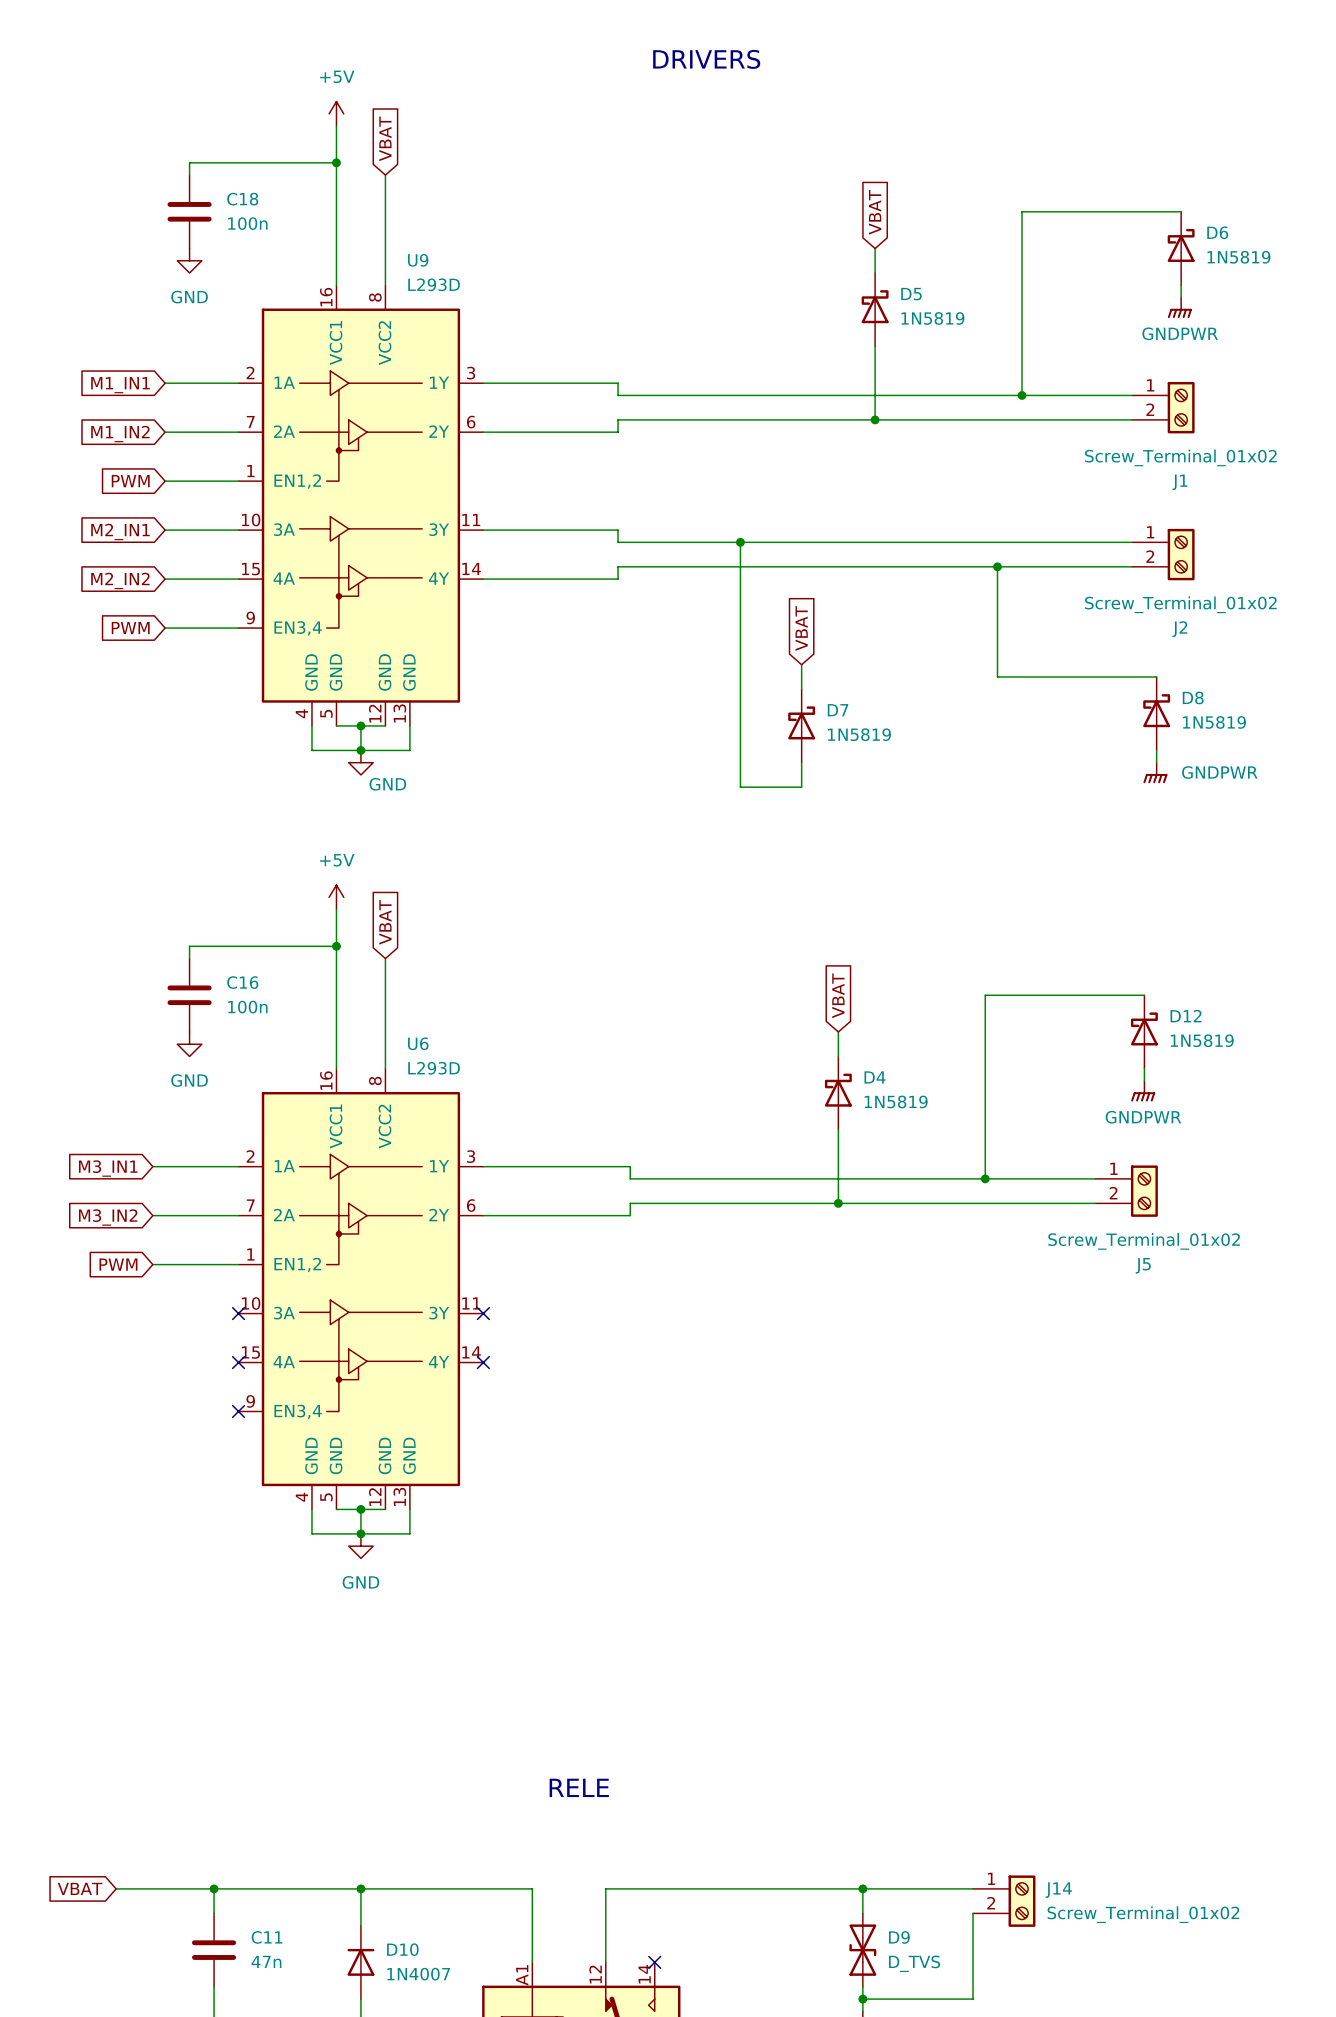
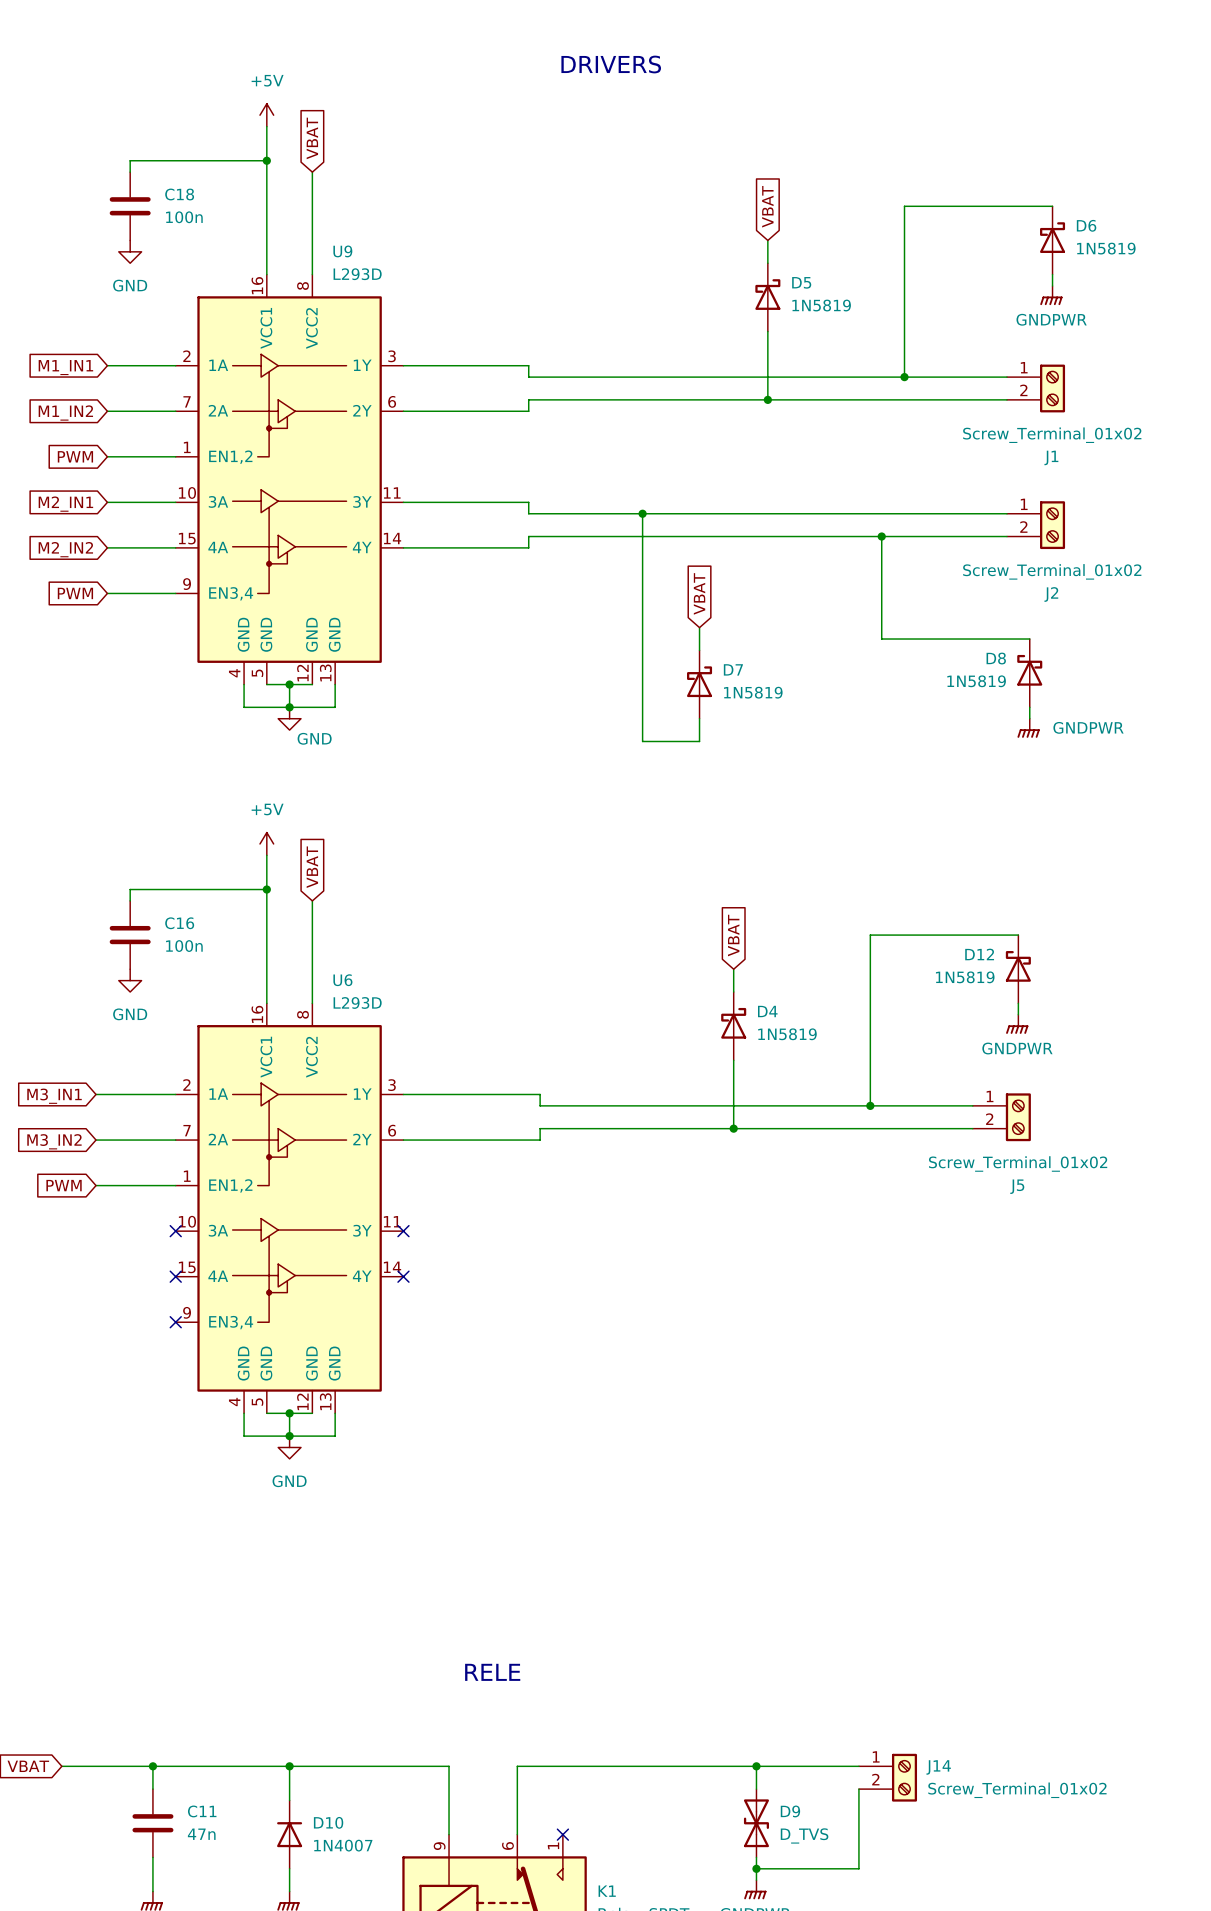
D8 flip: as is (1156, 710) -> left-right (1029, 670)
D12 flip: as is (1144, 1028) -> left-right (1018, 966)
K1 pin number: 12 (595, 1974) -> 6 (507, 1845)
K1 pin number: 14 (644, 1974) -> 1 (553, 1845)
K1 pin number: A1 (522, 1975) -> 9 (439, 1846)

